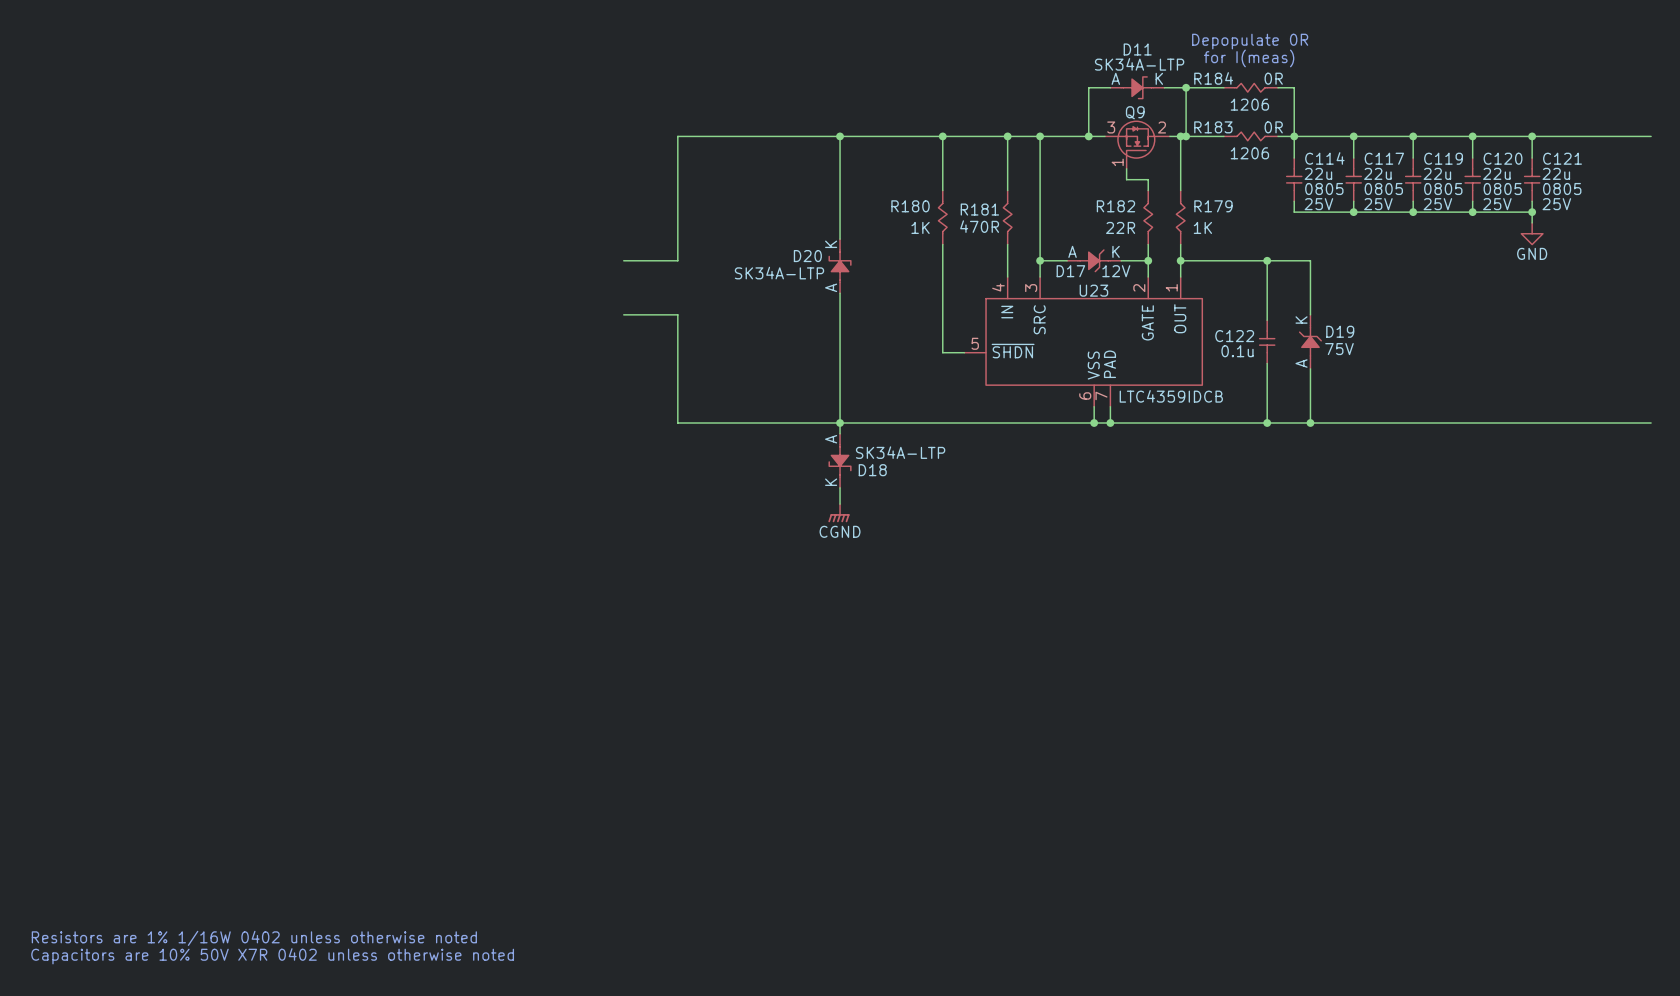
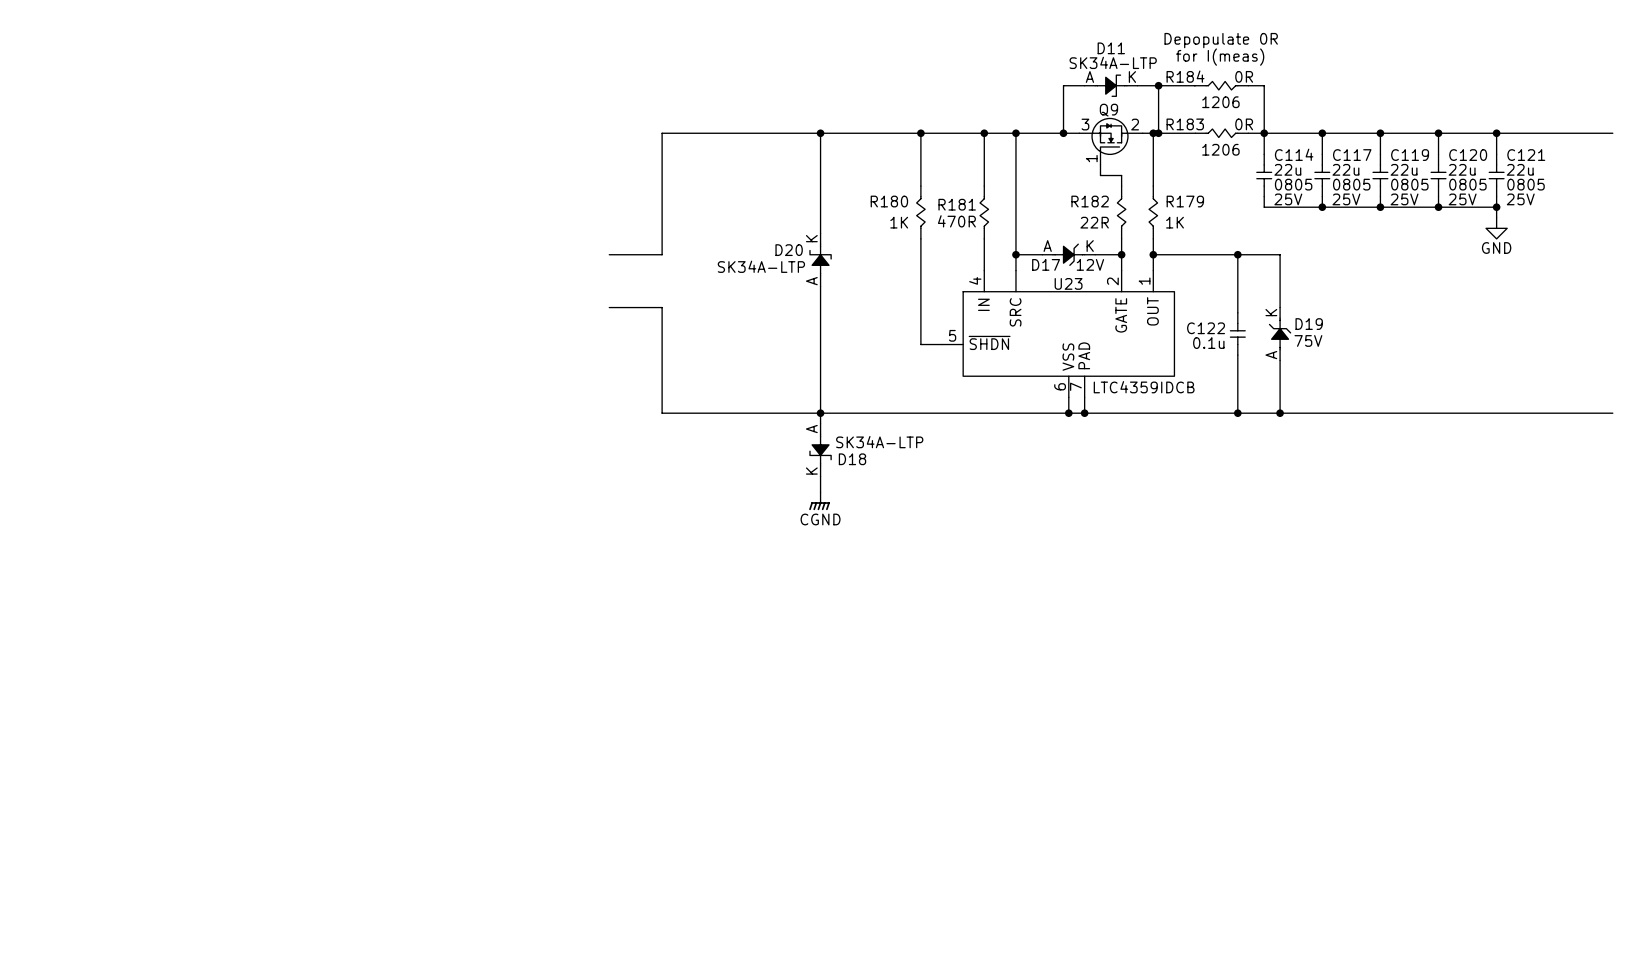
U23 pin number: 3 (1031, 288) -> none
text: Resistors are 1% 1/16W 0402 unless otherwise noted (254, 938) -> none
text: Capacitors are 10% 50V X7R 0402 unless otherwise noted (272, 956) -> none

